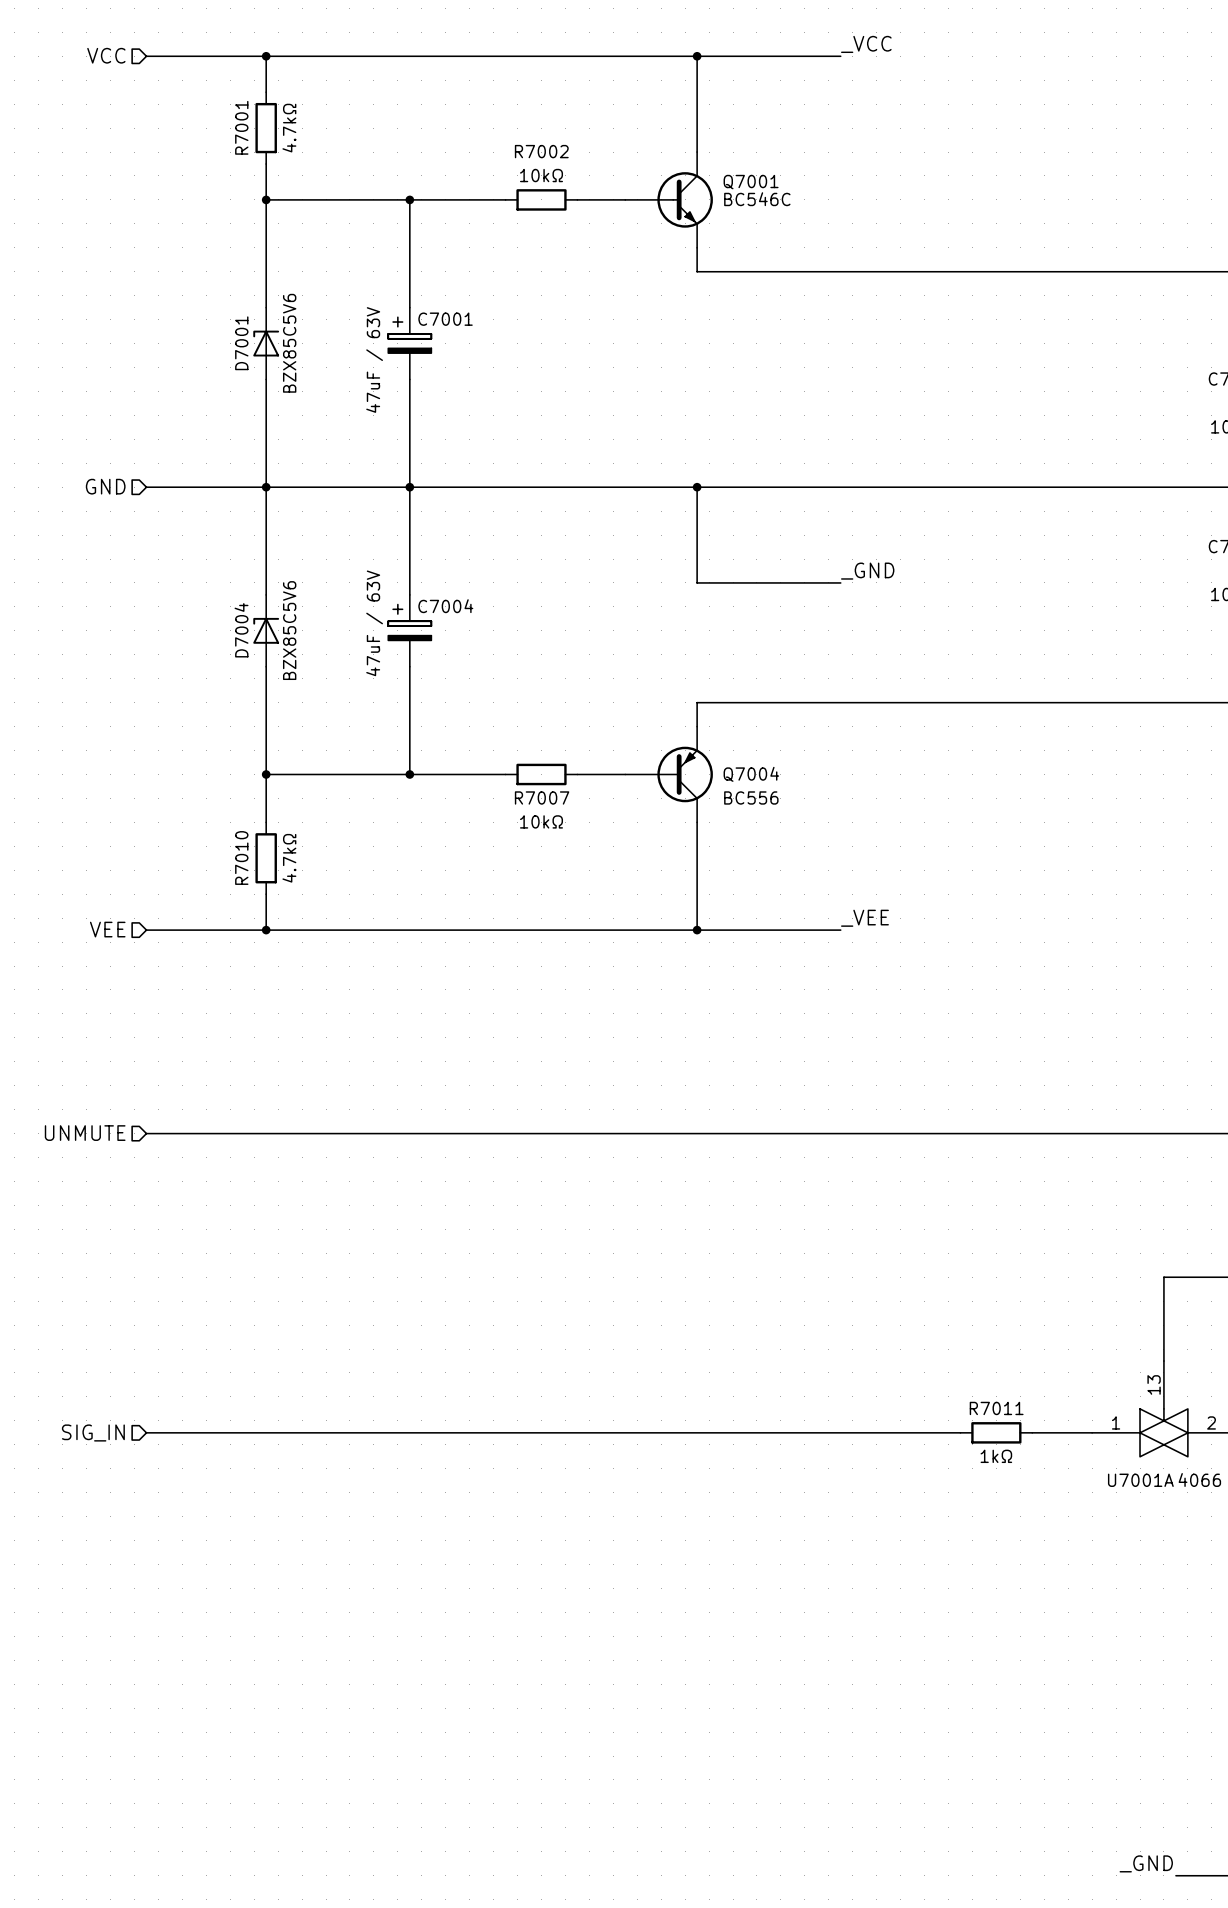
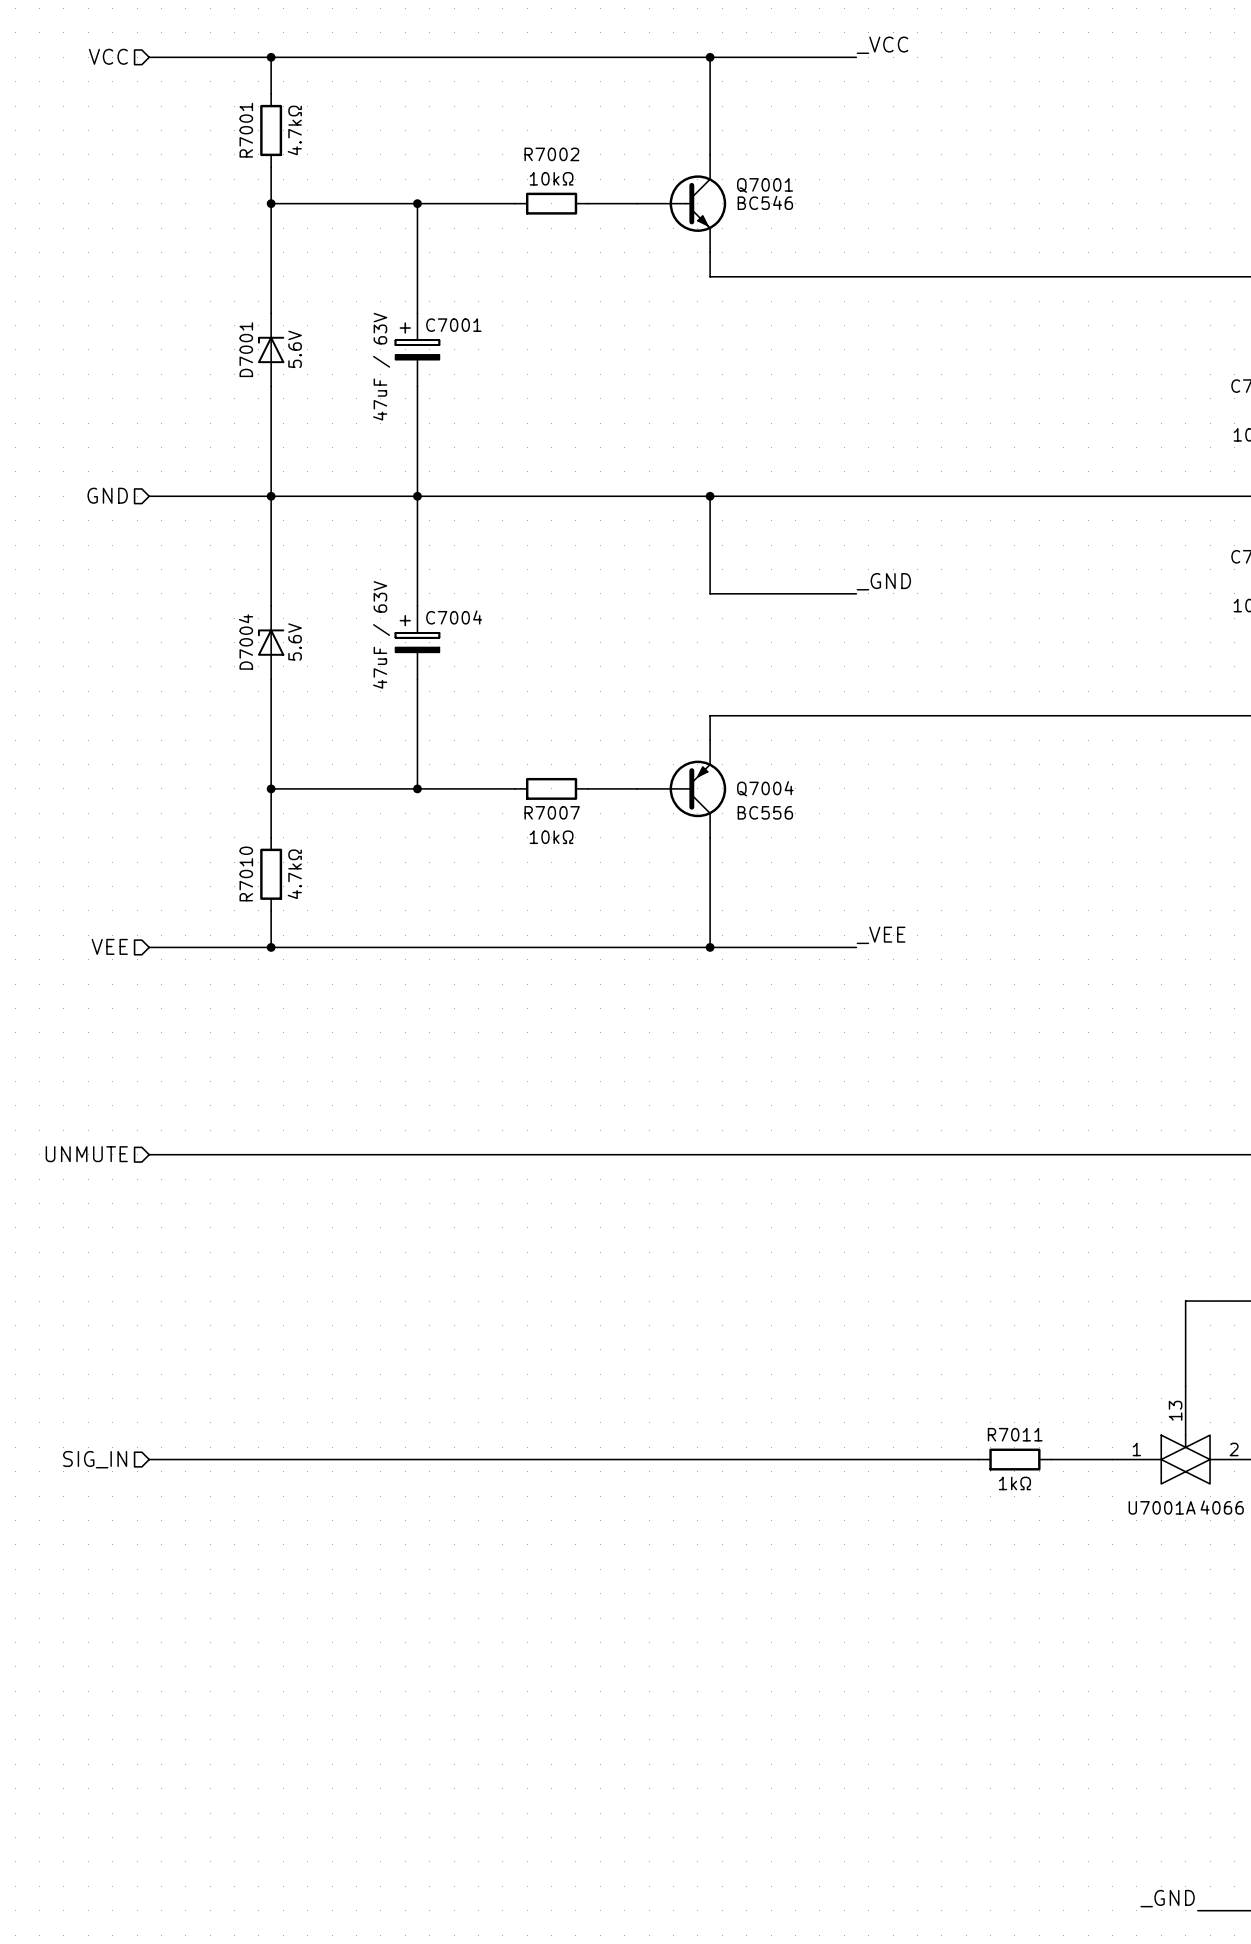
Q7001 value: BC546C (757, 199) -> BC546 (765, 202)
D7001 value: BZX85C5V6 (289, 343) -> 5.6V (295, 349)
D7004 value: BZX85C5V6 (289, 630) -> 5.6V (295, 642)

